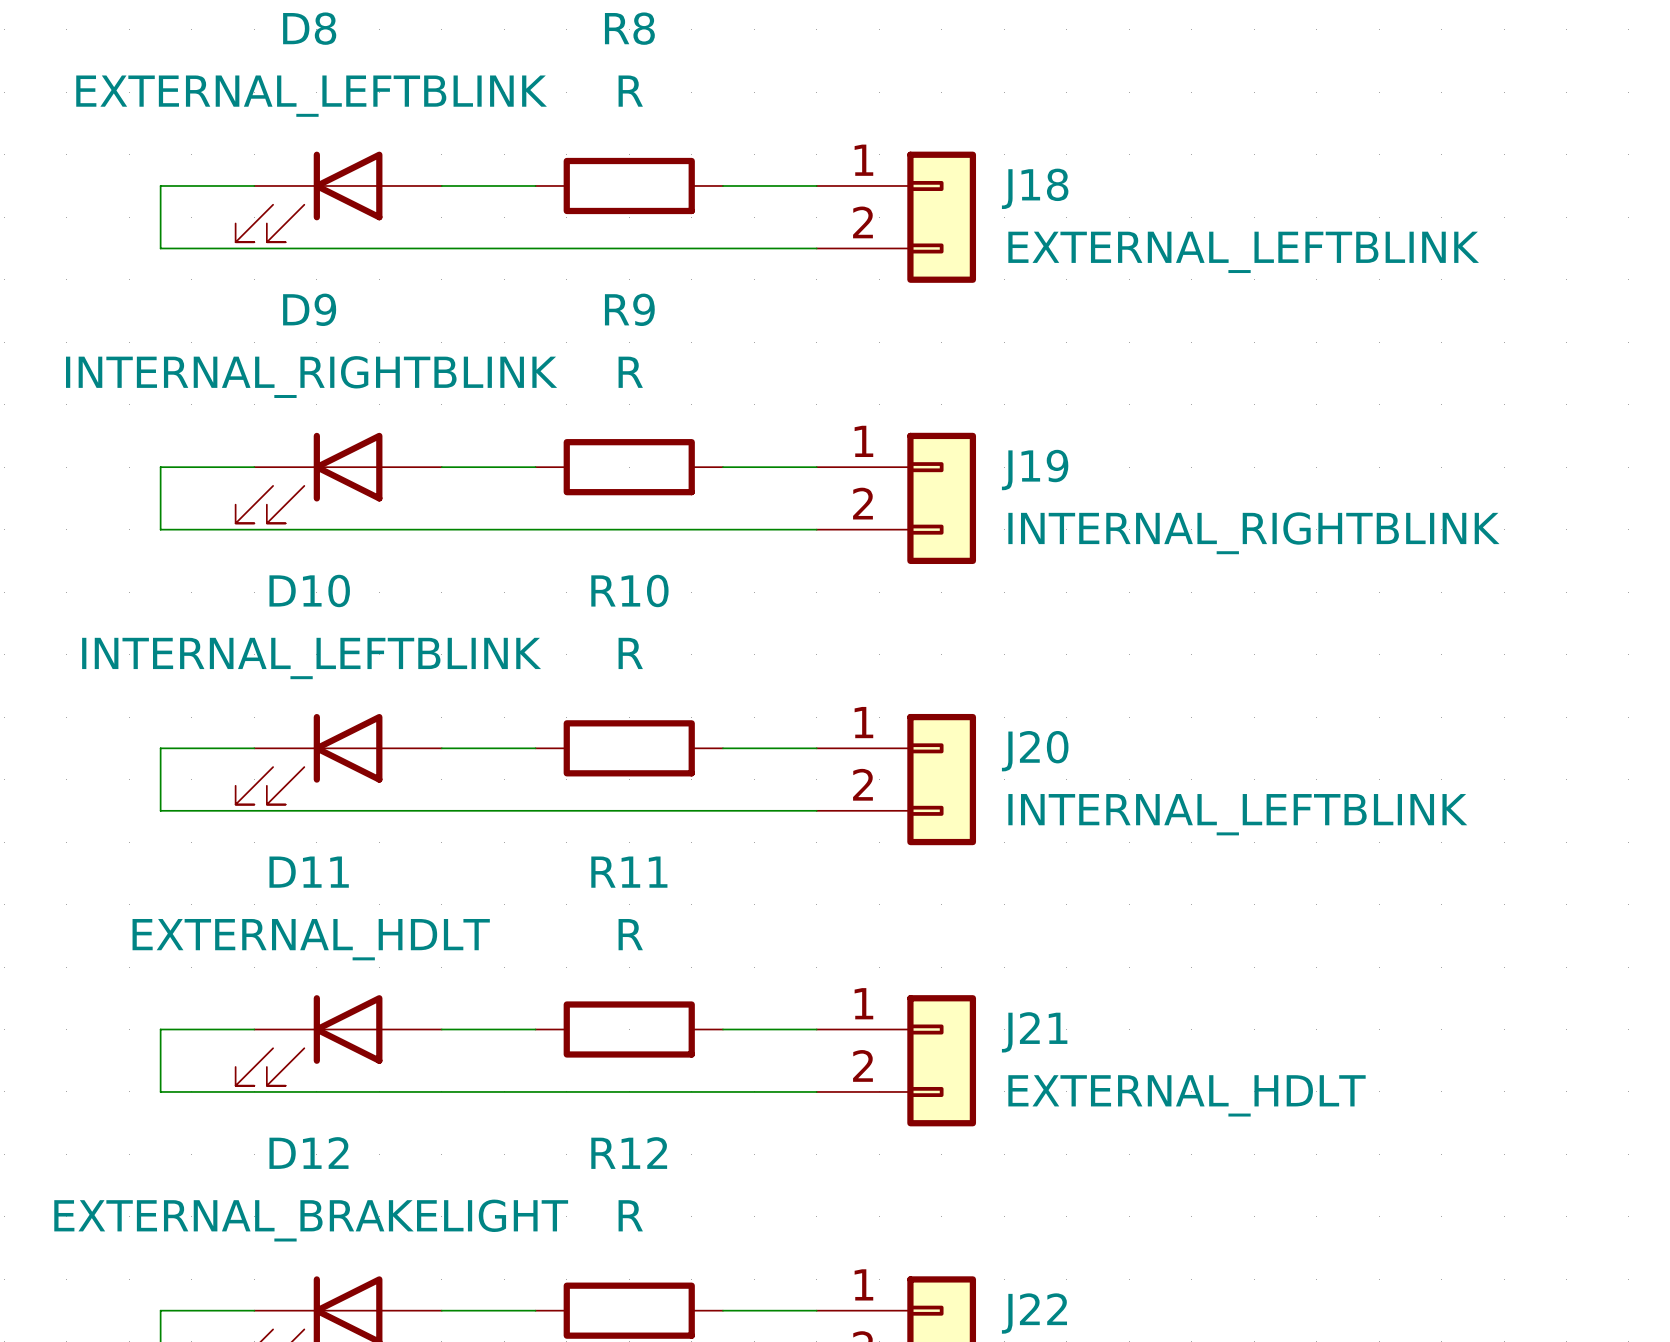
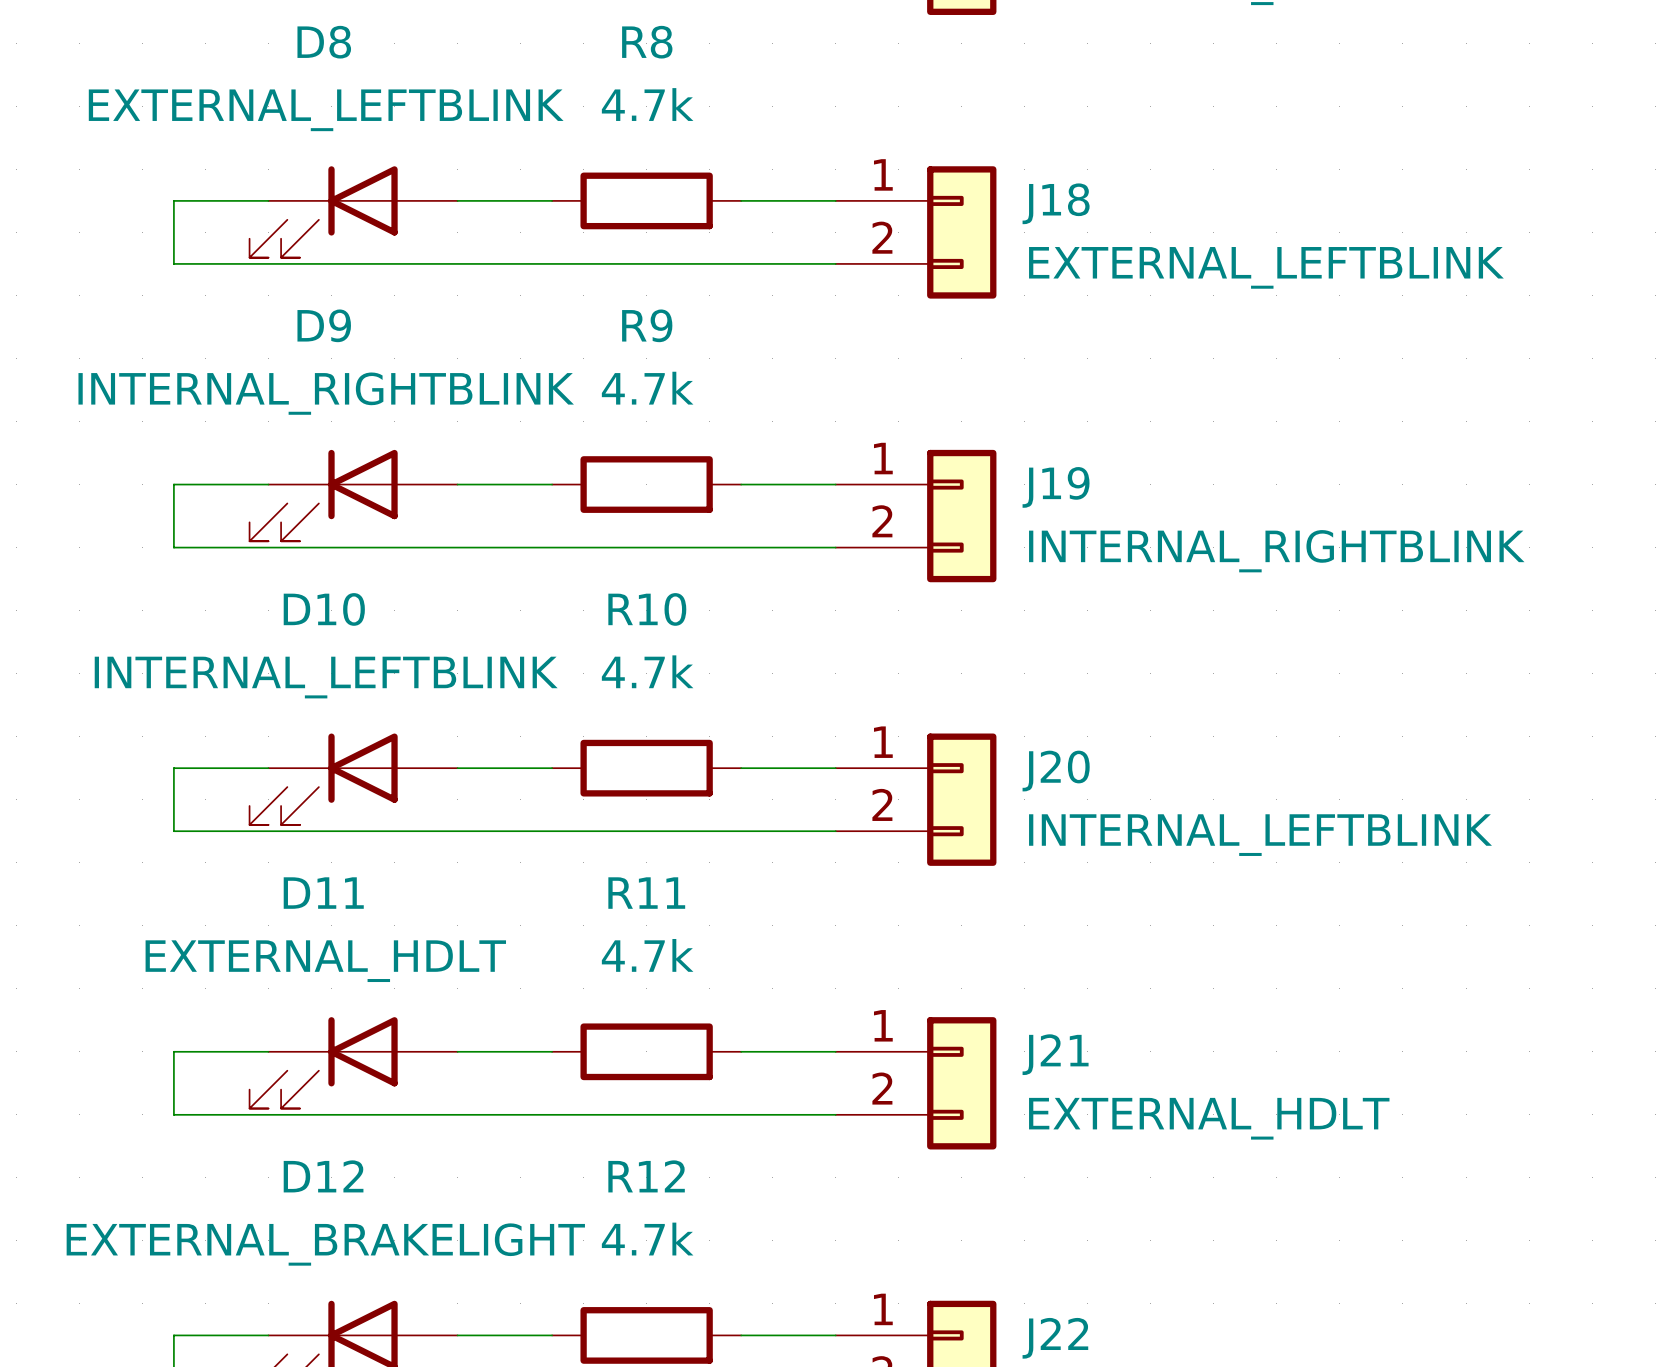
R8 value: R (630, 91) -> 4.7k (647, 104)
R9 value: R (630, 372) -> 4.7k (647, 388)
R10 value: R (630, 653) -> 4.7k (647, 671)
R11 value: R (630, 934) -> 4.7k (647, 955)
R12 value: R (630, 1215) -> 4.7k (647, 1239)

